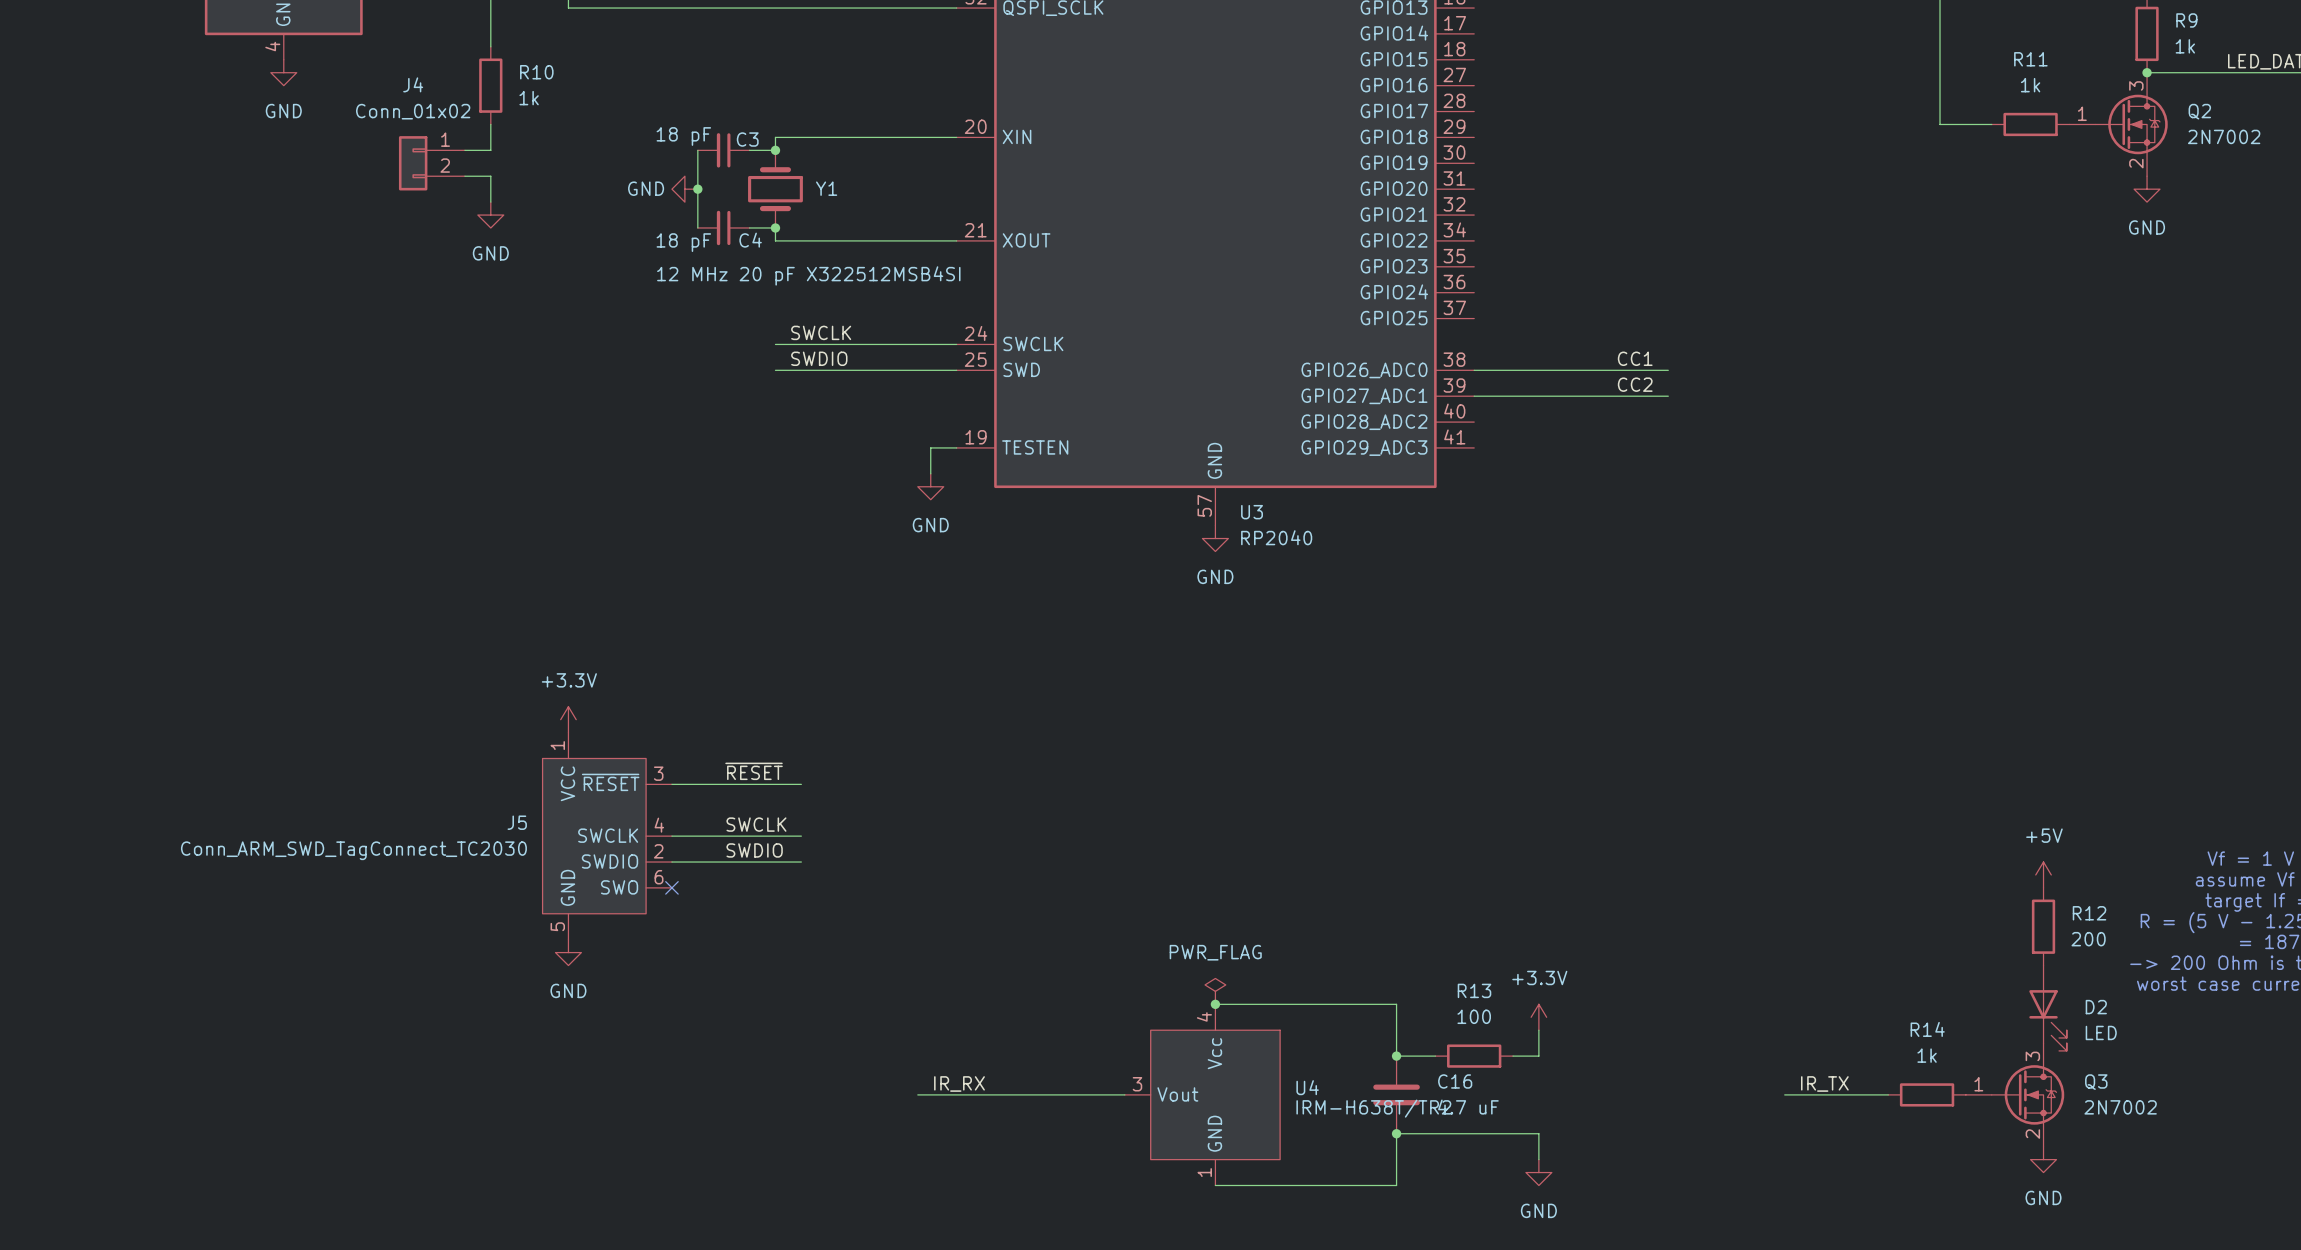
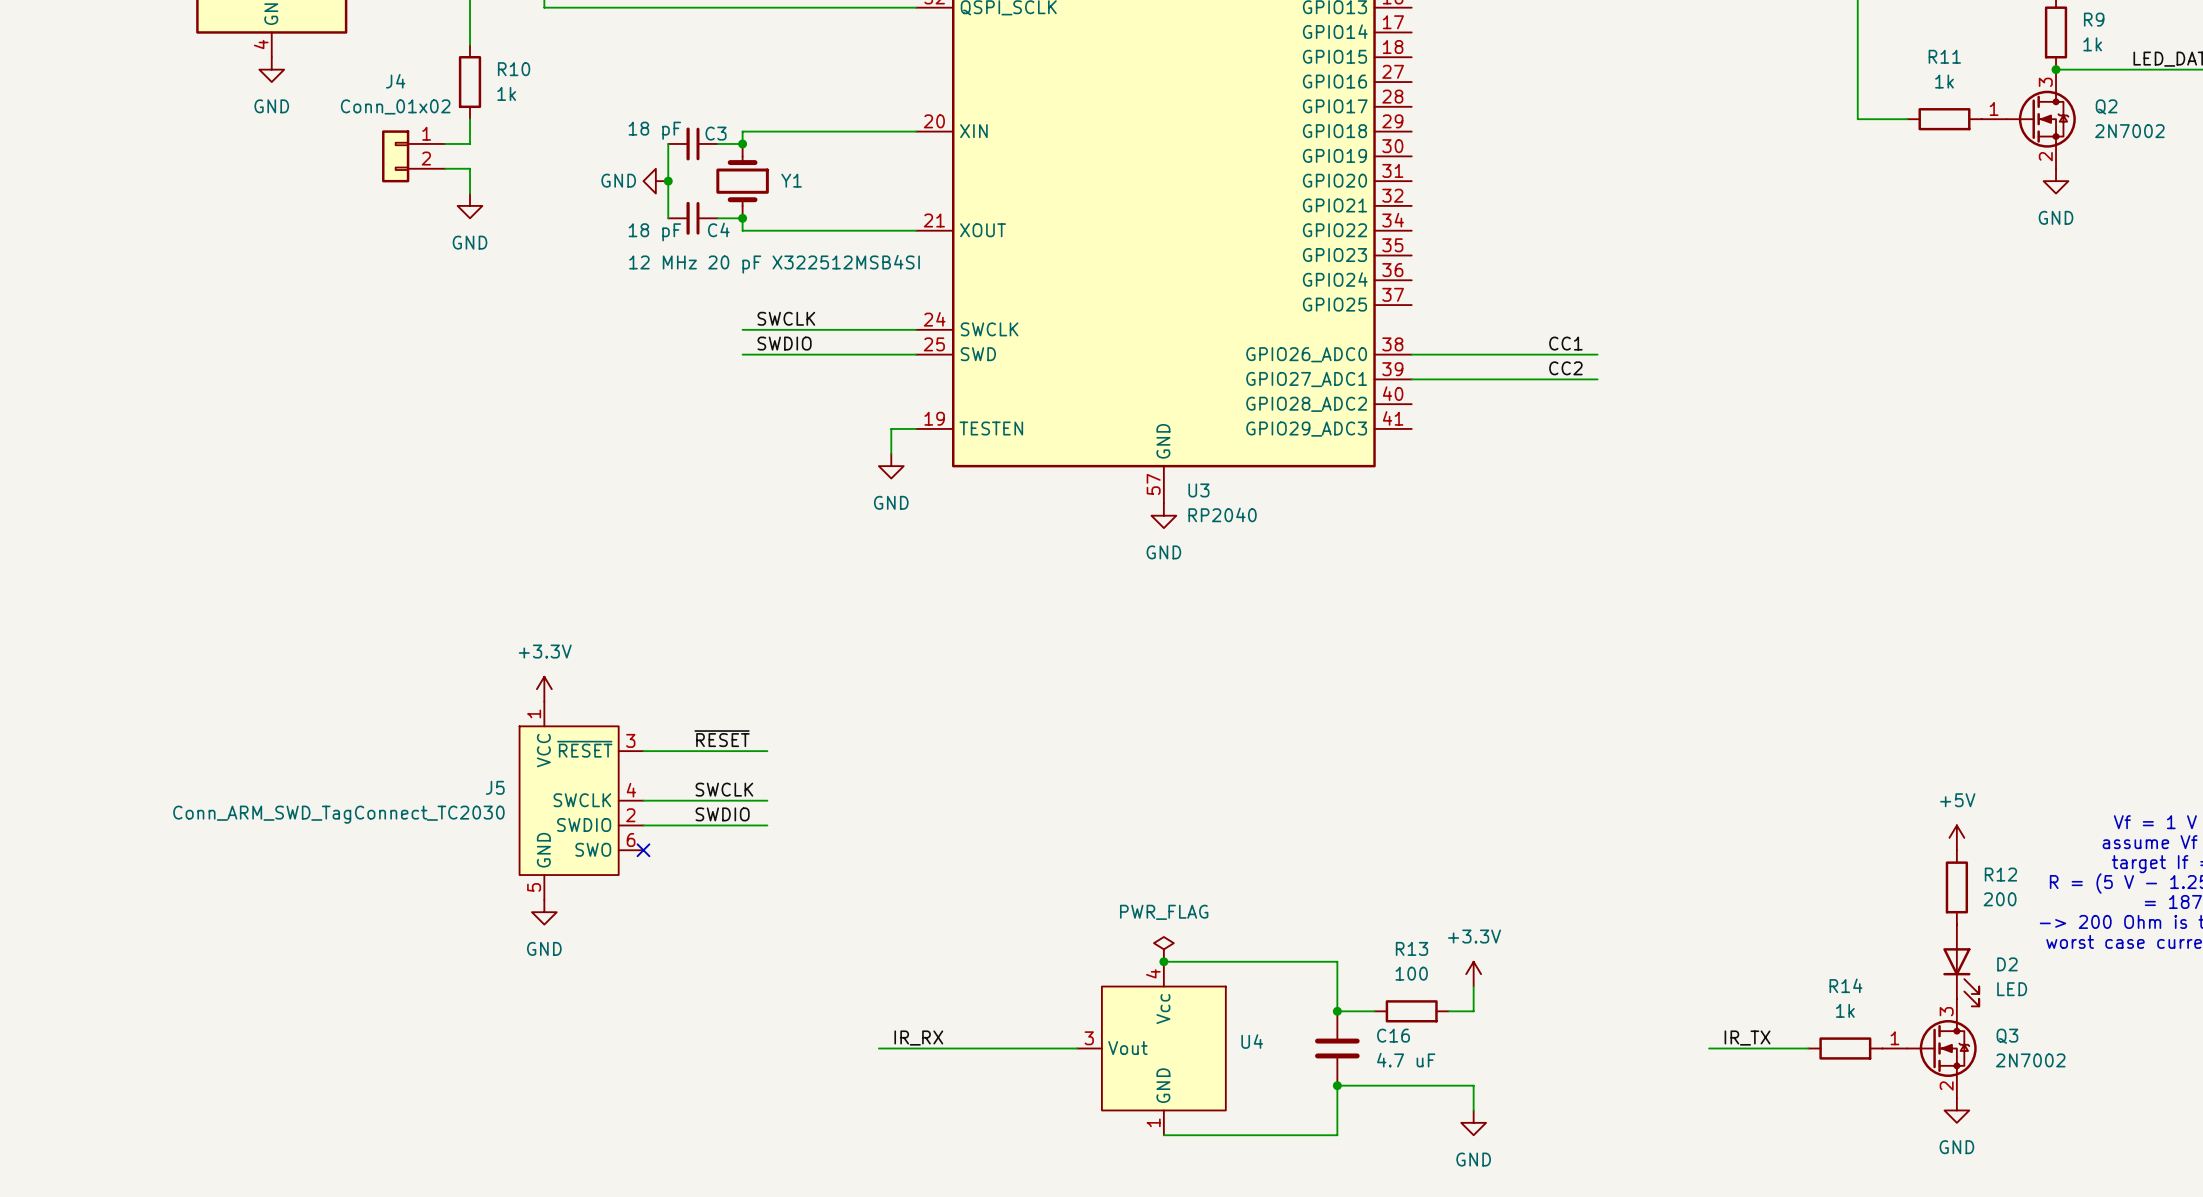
U4 value: IRM-H638T/TR2 (1373, 1108) -> none

